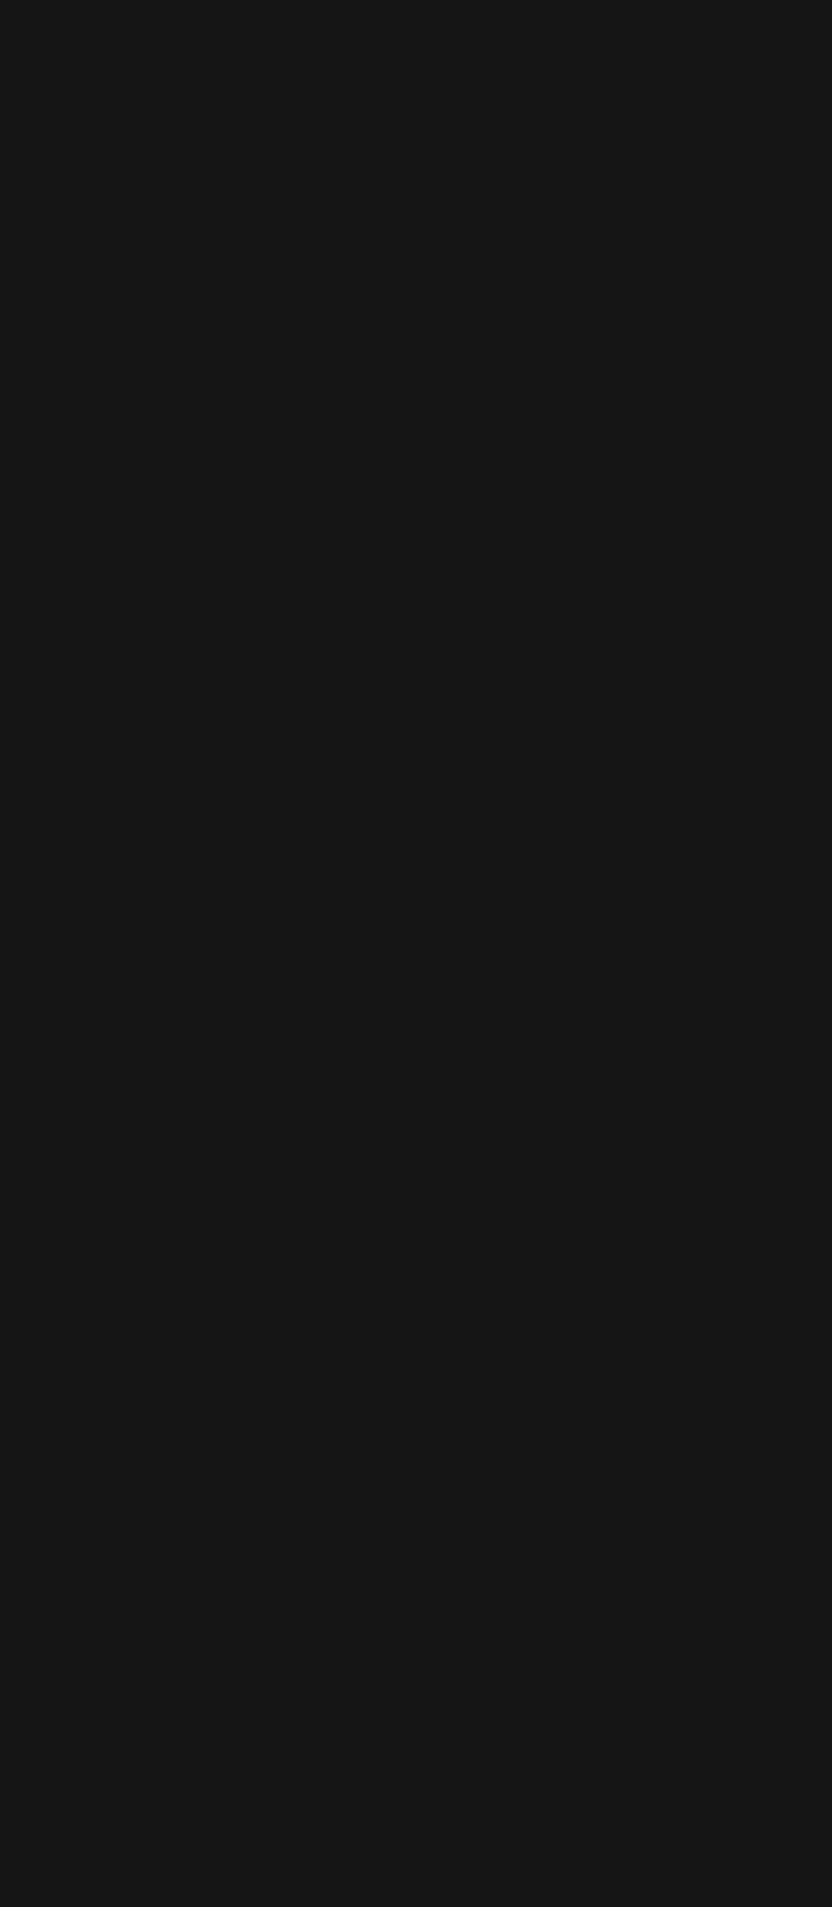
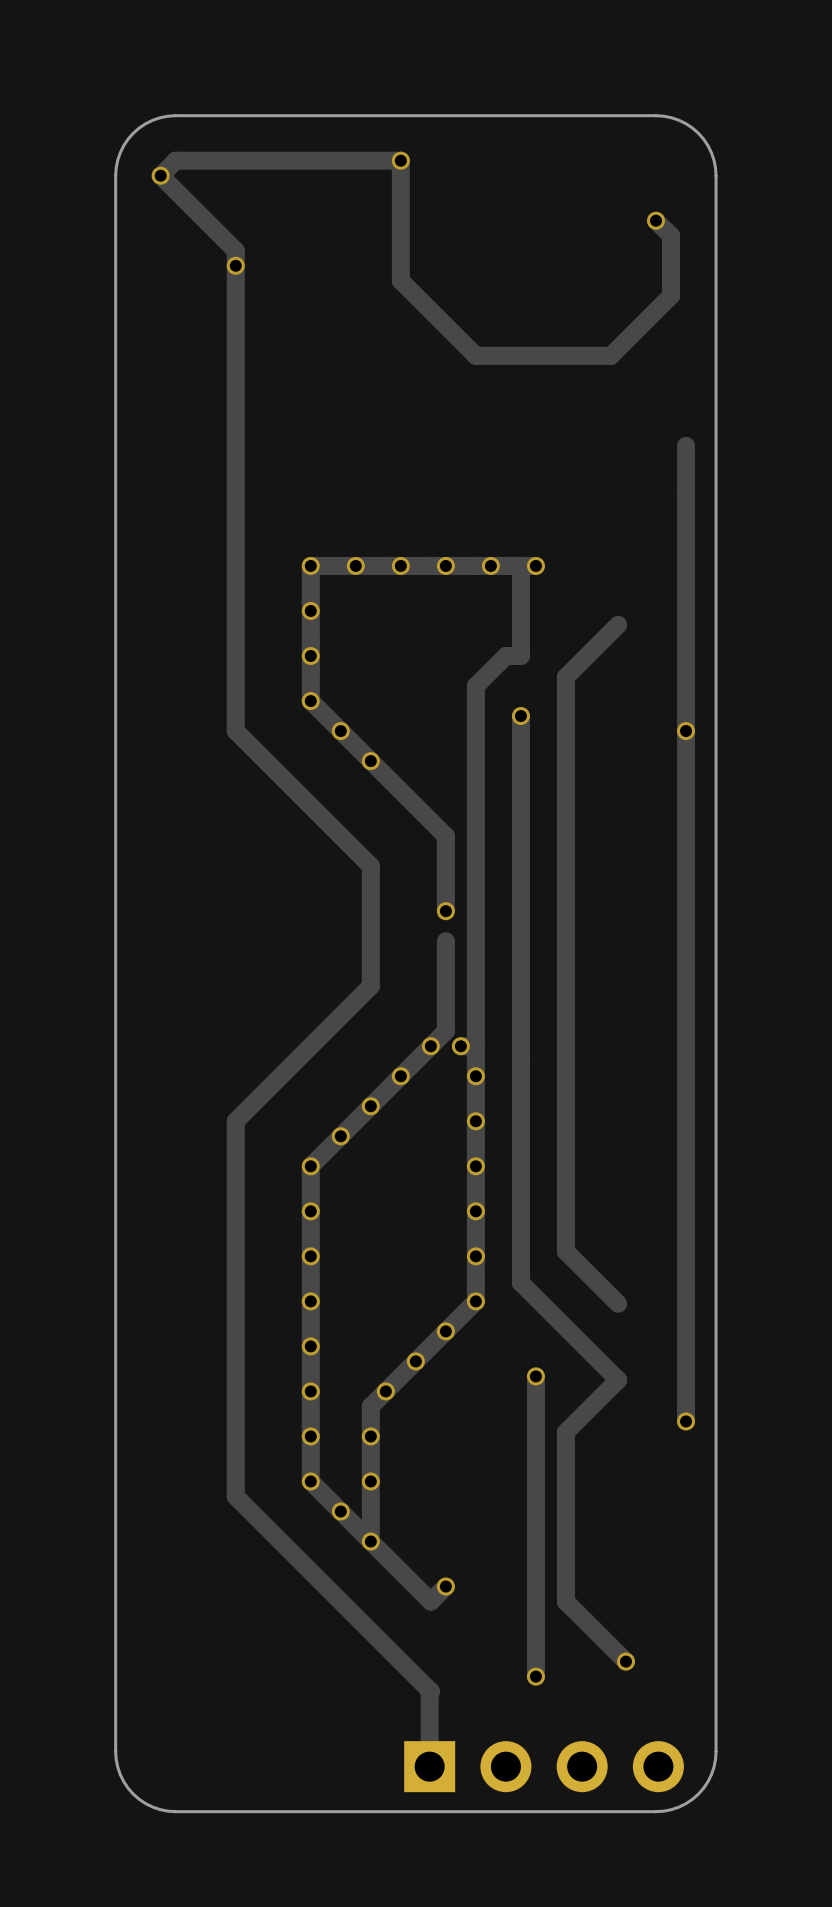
board edge: none -> (656, 115) (167, 116) (145, 123) (133, 133) (123, 145) (117, 160) (115, 175) (115, 1751) (120, 1774) (128, 1788) (145, 1803) (160, 1809) (175, 1811) (663, 1811) (686, 1803) (698, 1794) (708, 1781) (713, 1767) (716, 1751) (716, 175) (711, 152) (698, 133) (678, 120) (656, 115)
via: none -> (400, 160)
via: none -> (160, 175)
track: none -> (656, 220) (671, 235) (671, 295) (610, 355) (475, 355) (400, 280) (400, 160) (175, 160) (160, 175) (235, 250) (235, 731) (370, 866) (370, 986) (235, 1121) (235, 1496) (430, 1691) (429, 1766)
via: none -> (656, 220)
via: none -> (235, 265)
track: none -> (686, 445) (686, 1421)
via: none -> (310, 565)
via: none -> (355, 565)
via: none -> (400, 565)
via: none -> (445, 565)
via: none -> (490, 565)
track: none -> (520, 565) (520, 656) (505, 656) (475, 686) (475, 1301) (370, 1406) (370, 1541)
track: none -> (535, 565) (310, 565) (310, 701) (445, 836) (445, 911)
via: none -> (535, 565)
via: none -> (310, 610)
track: none -> (618, 624) (565, 677) (565, 1251) (618, 1303)
via: none -> (310, 656)
via: none -> (310, 701)
track: none -> (520, 716) (520, 1282) (618, 1380) (565, 1432) (565, 1601) (625, 1661)
via: none -> (520, 716)
via: none -> (340, 731)
via: none -> (686, 731)
via: none -> (370, 761)
via: none -> (445, 911)
track: none -> (445, 941) (445, 1031) (310, 1166) (310, 1481) (430, 1601) (445, 1586)
via: none -> (430, 1046)
via: none -> (460, 1046)
via: none -> (400, 1076)
via: none -> (475, 1076)
via: none -> (370, 1106)
via: none -> (475, 1121)
via: none -> (340, 1136)
via: none -> (310, 1166)
via: none -> (475, 1166)
via: none -> (310, 1211)
via: none -> (475, 1211)
via: none -> (310, 1256)
via: none -> (475, 1256)
via: none -> (310, 1301)
via: none -> (475, 1301)
via: none -> (445, 1331)
via: none -> (310, 1346)
via: none -> (415, 1361)
track: none -> (535, 1376) (535, 1676)
via: none -> (535, 1376)
via: none -> (310, 1391)
via: none -> (385, 1391)
via: none -> (686, 1421)
via: none -> (310, 1436)
via: none -> (370, 1436)
via: none -> (310, 1481)
via: none -> (370, 1481)
via: none -> (340, 1511)
via: none -> (370, 1541)
via: none -> (445, 1586)
via: none -> (625, 1661)
via: none -> (535, 1676)
part: none -> (544, 1766)

